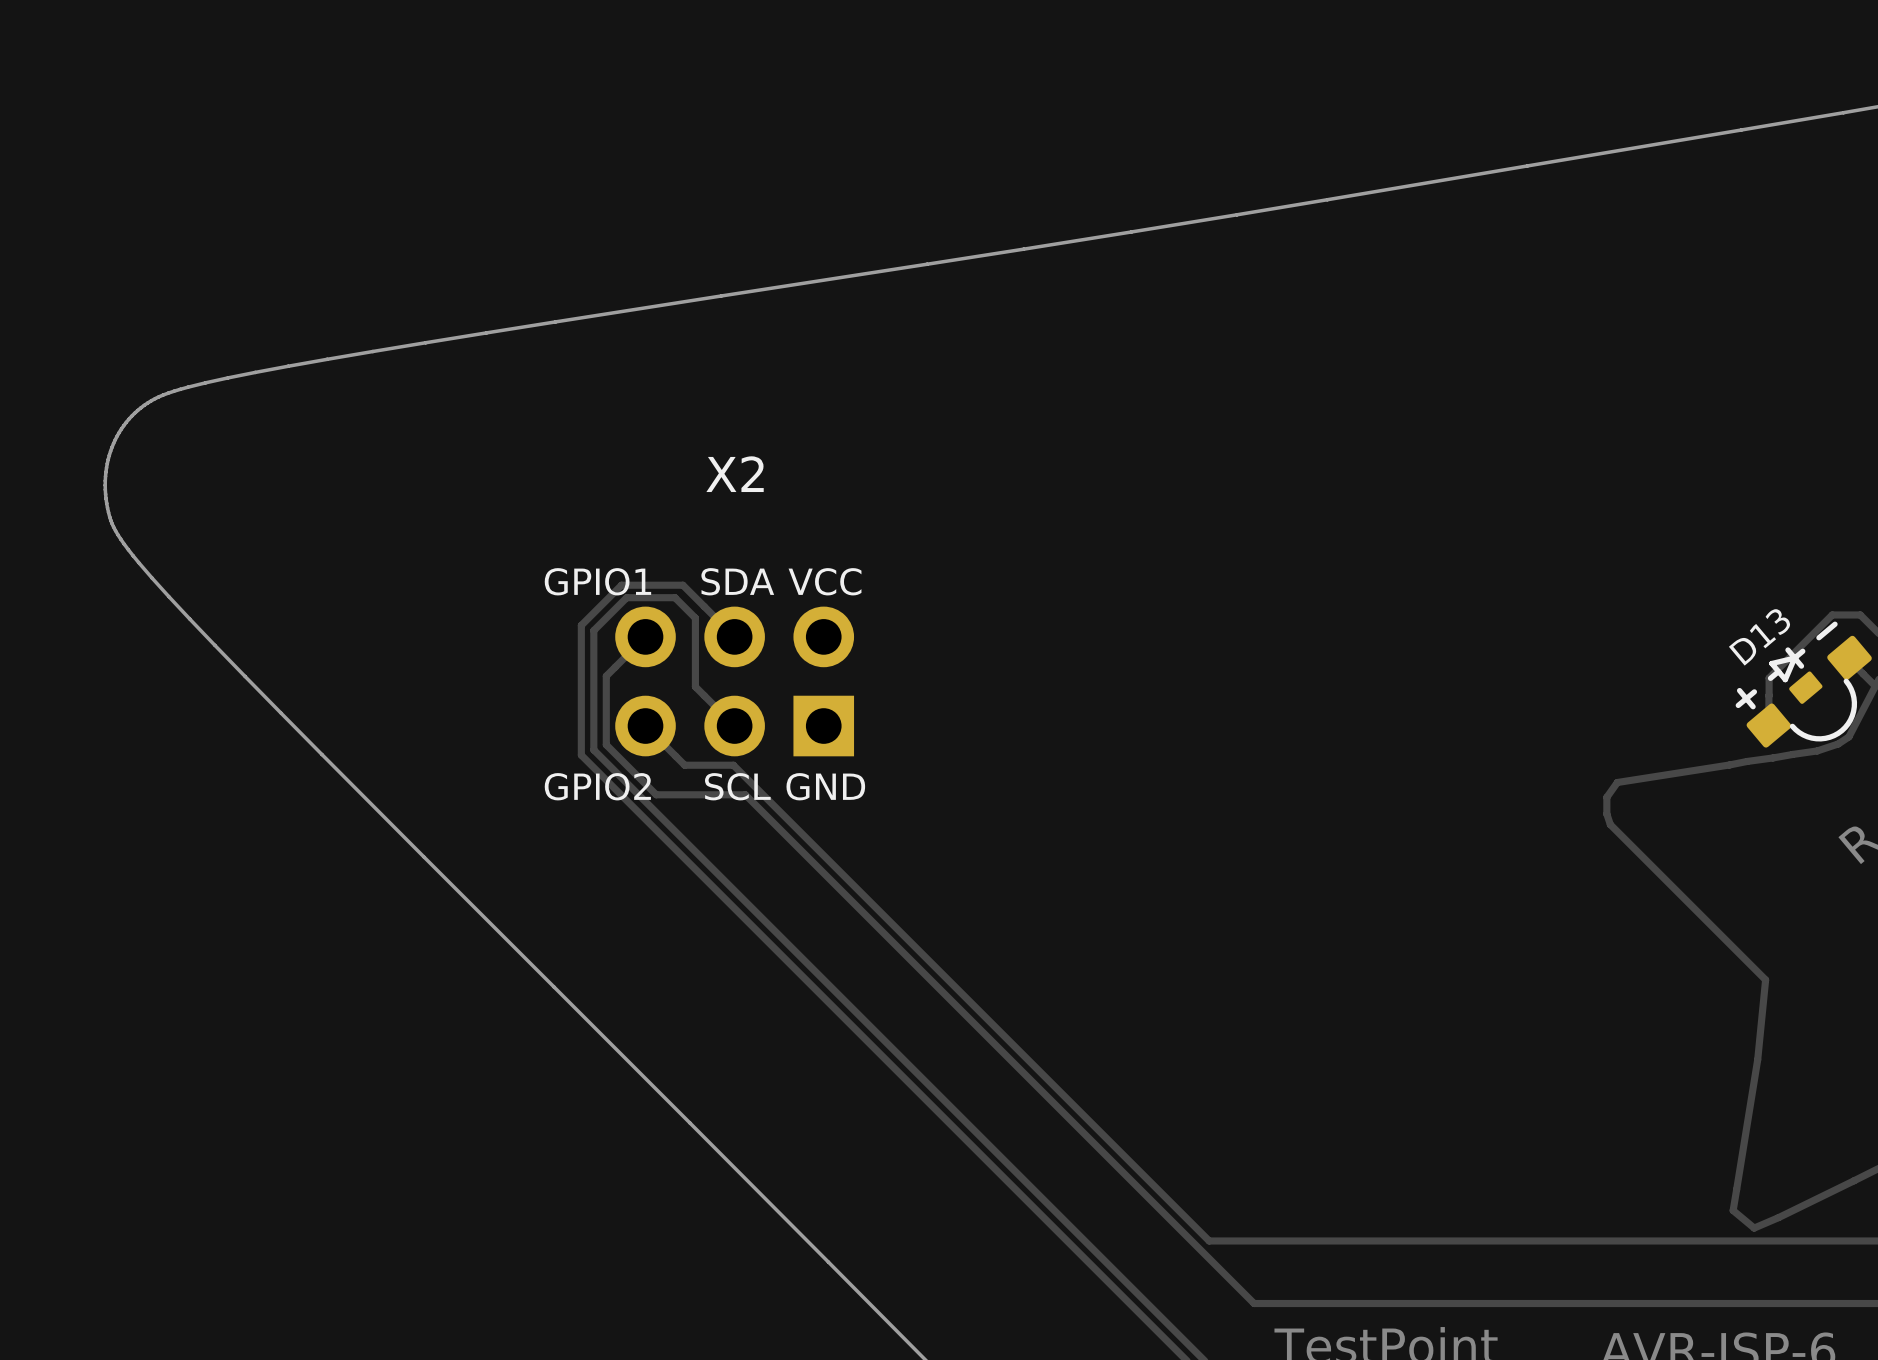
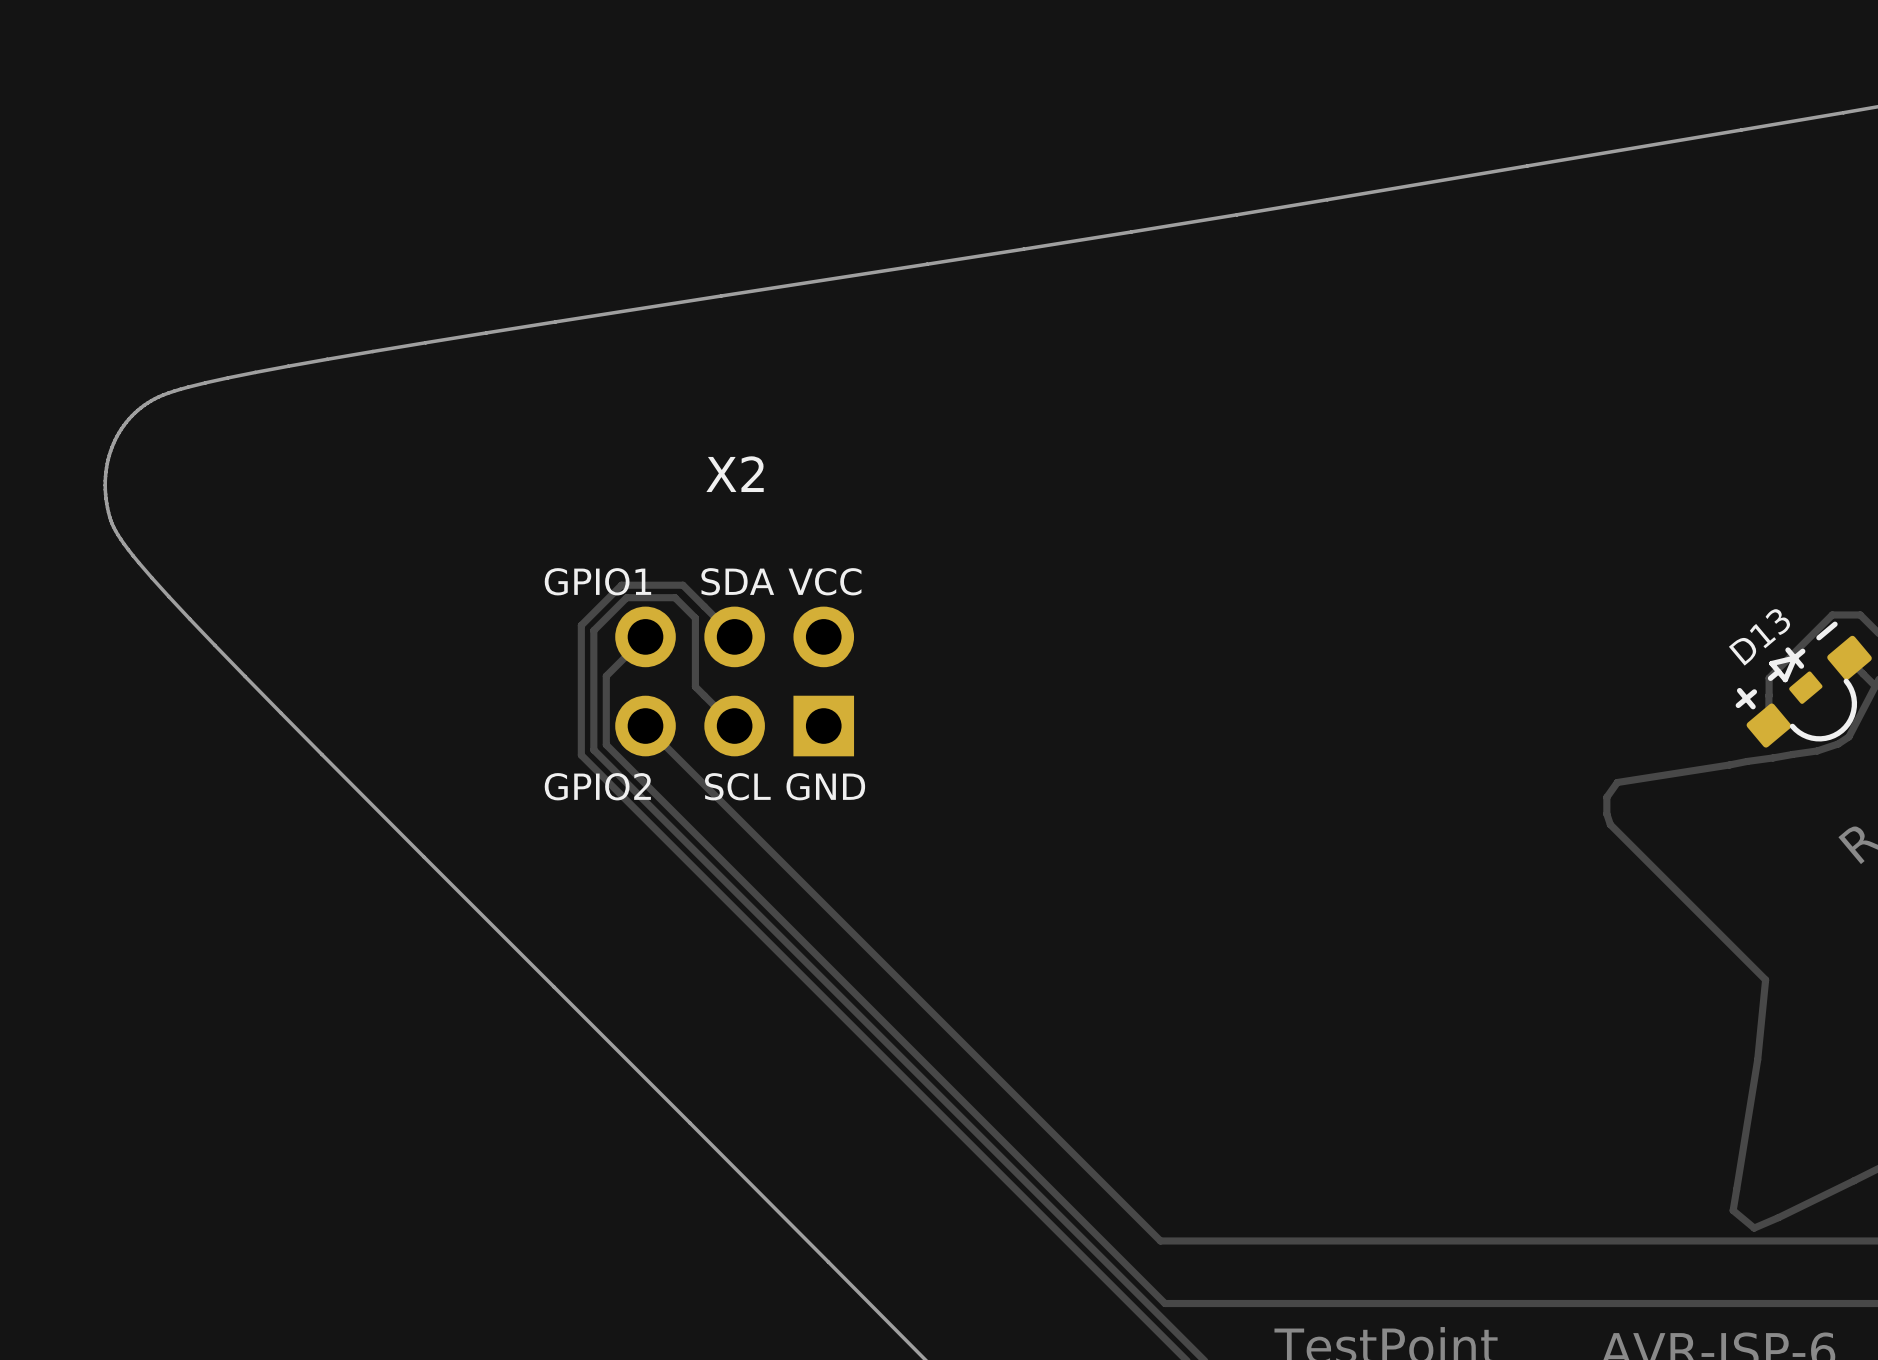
track: (684, 765) (733, 765) (1209, 1240) -> (684, 765) (1160, 1240) (1209, 1240)
track: (656, 794) (745, 794) (1254, 1303) -> (656, 794) (1164, 1303) (1254, 1303)

